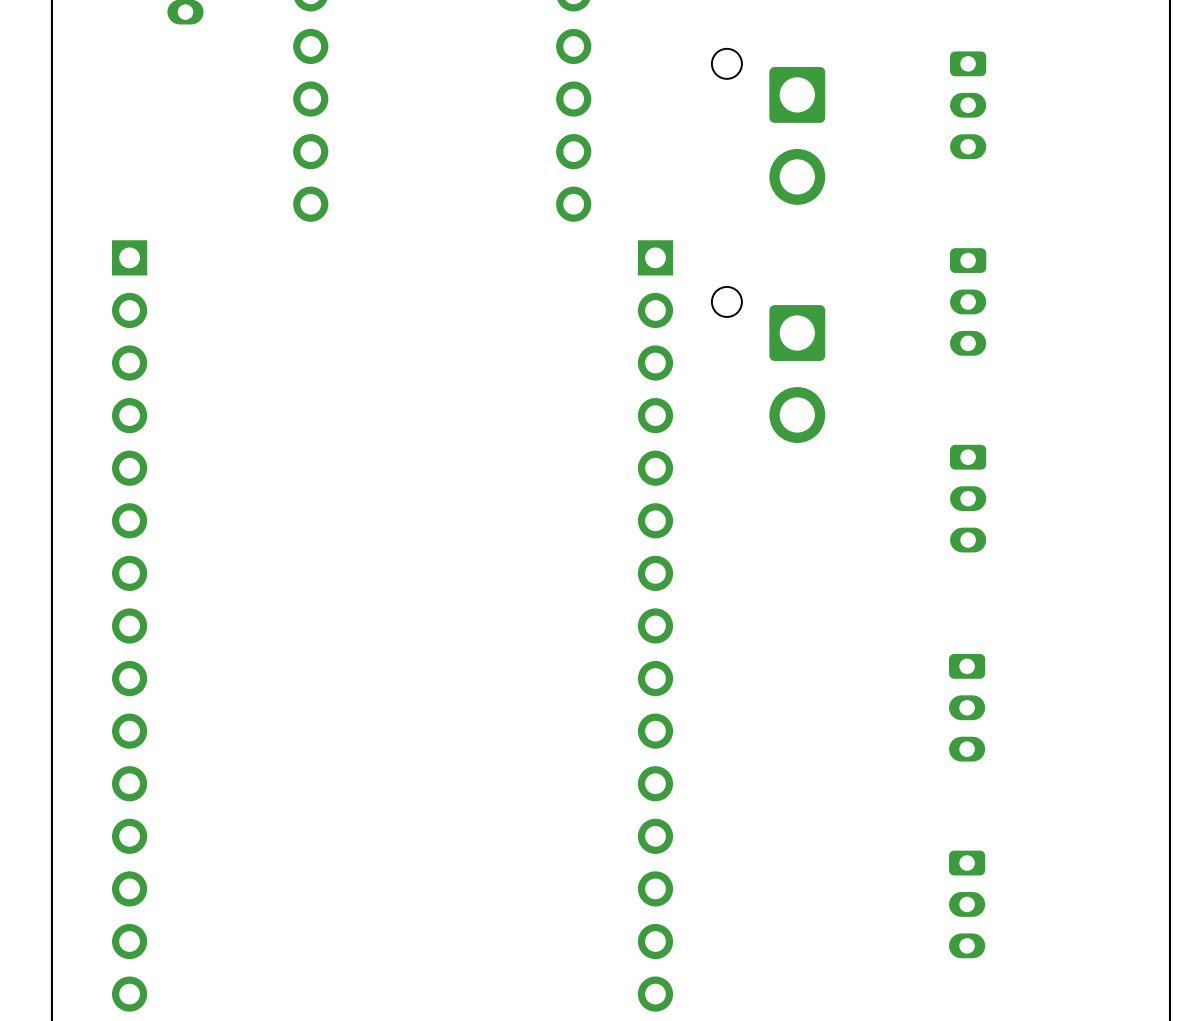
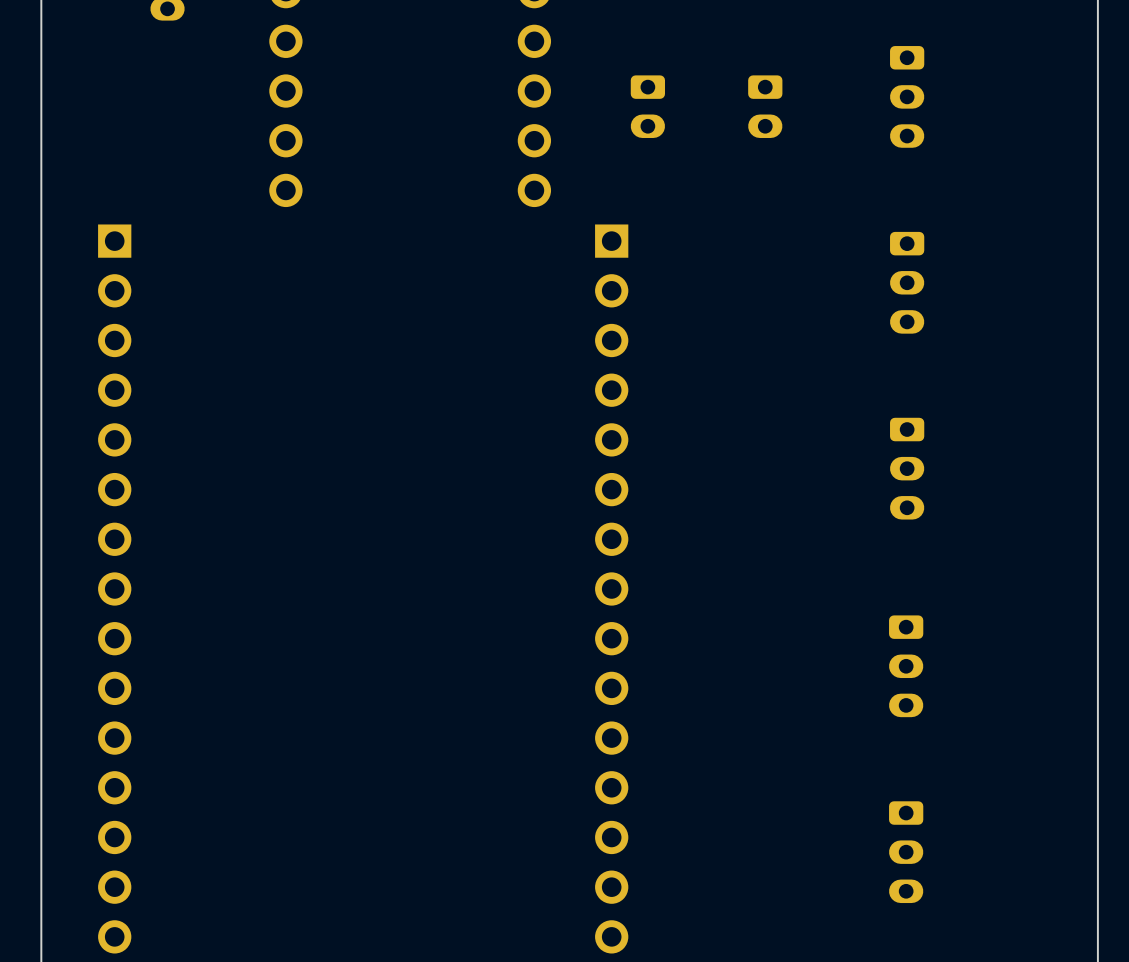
part: none -> (647, 106)
part: none -> (765, 106)
part: (768, 126) -> none
part: (768, 364) -> none

